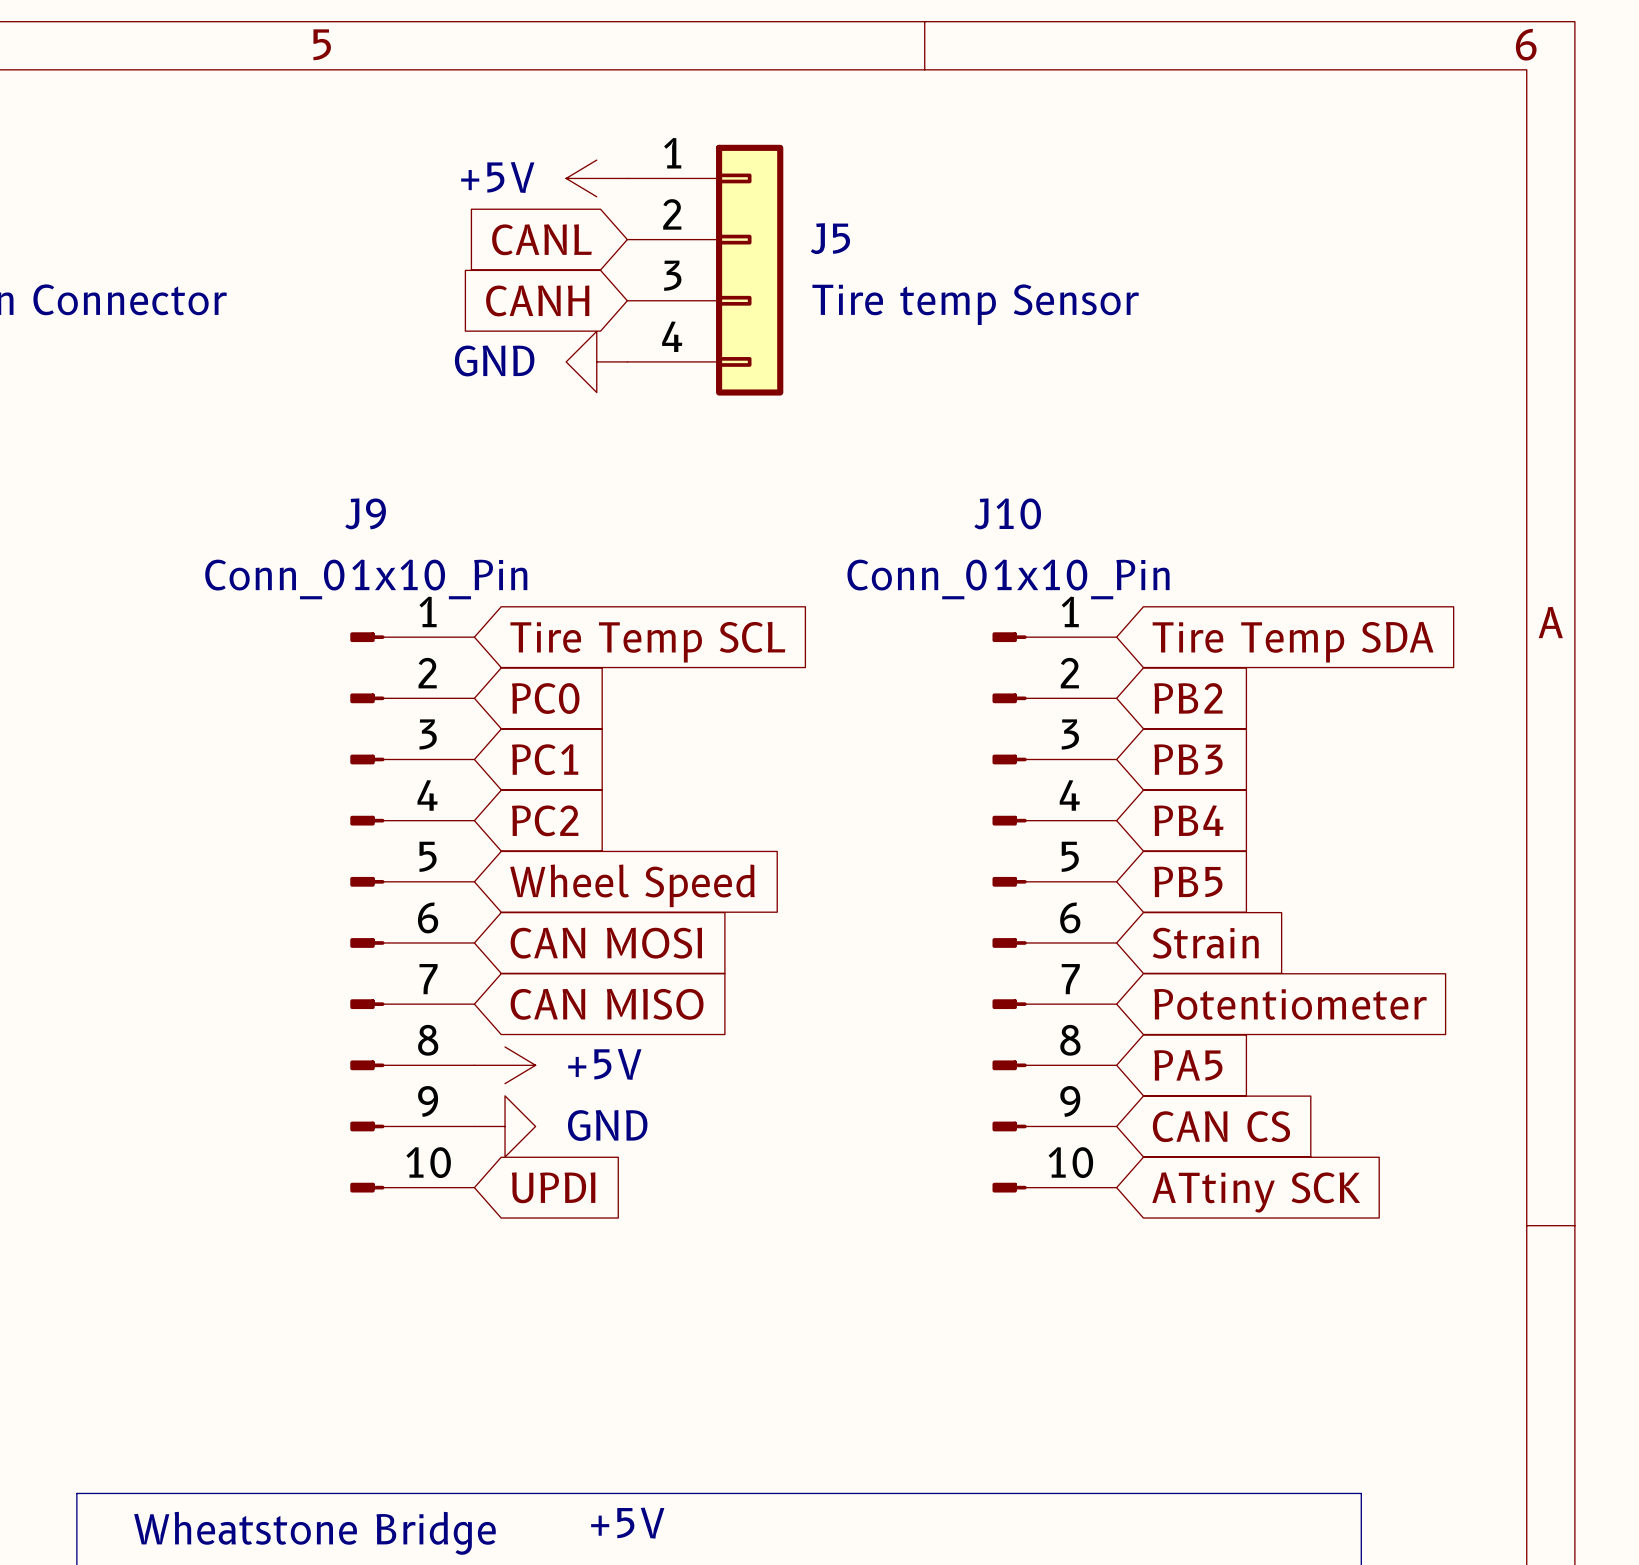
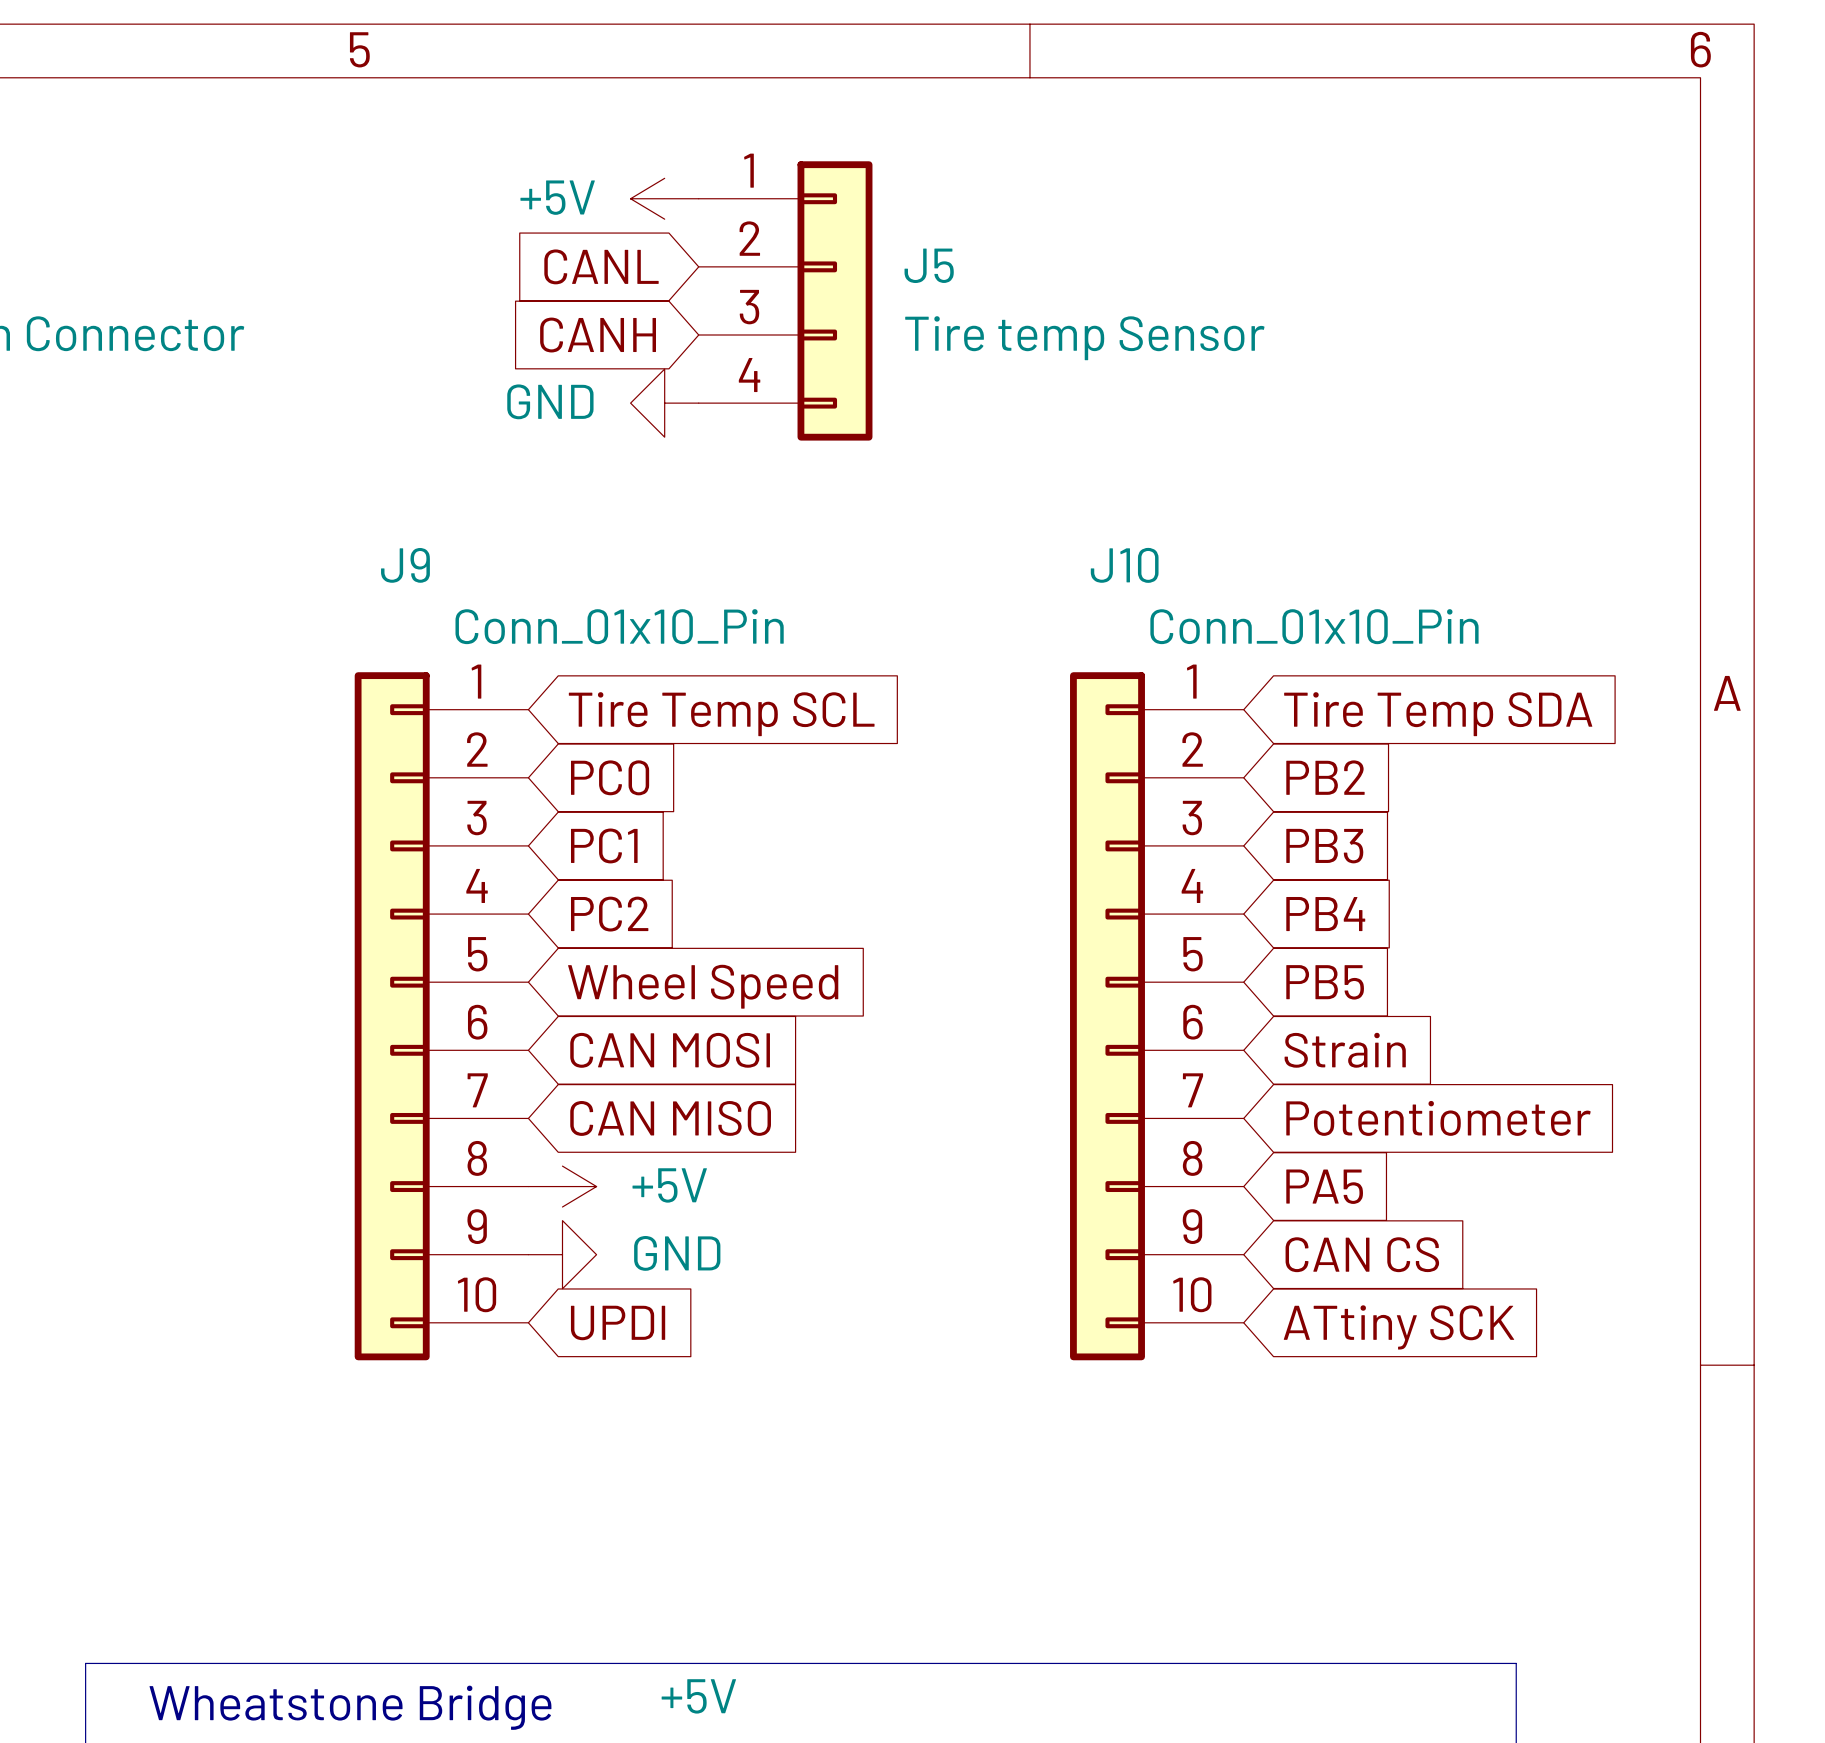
J9 value position: Conn_01x10_Pin (366, 579) -> Conn_01x10_Pin (619, 626)
J10 value position: Conn_01x10_Pin (1008, 579) -> Conn_01x10_Pin (1314, 626)
J9 symbol: [350, 632, 475, 1193] -> [354, 672, 529, 1361]
J10 symbol: [992, 632, 1117, 1193] -> [1070, 672, 1244, 1361]

